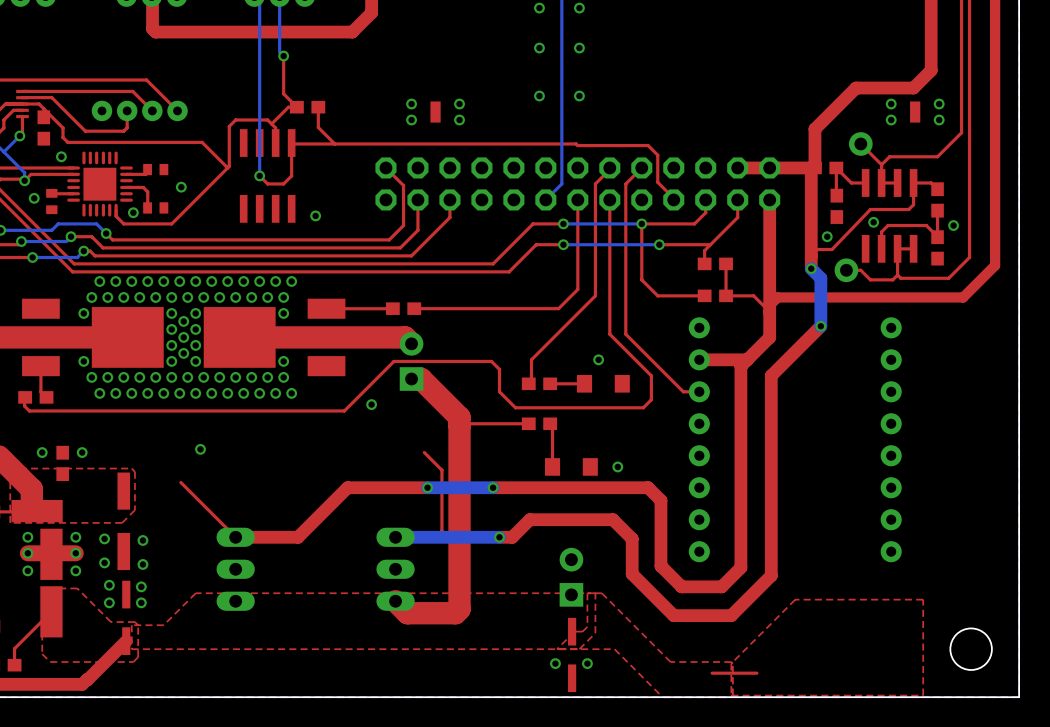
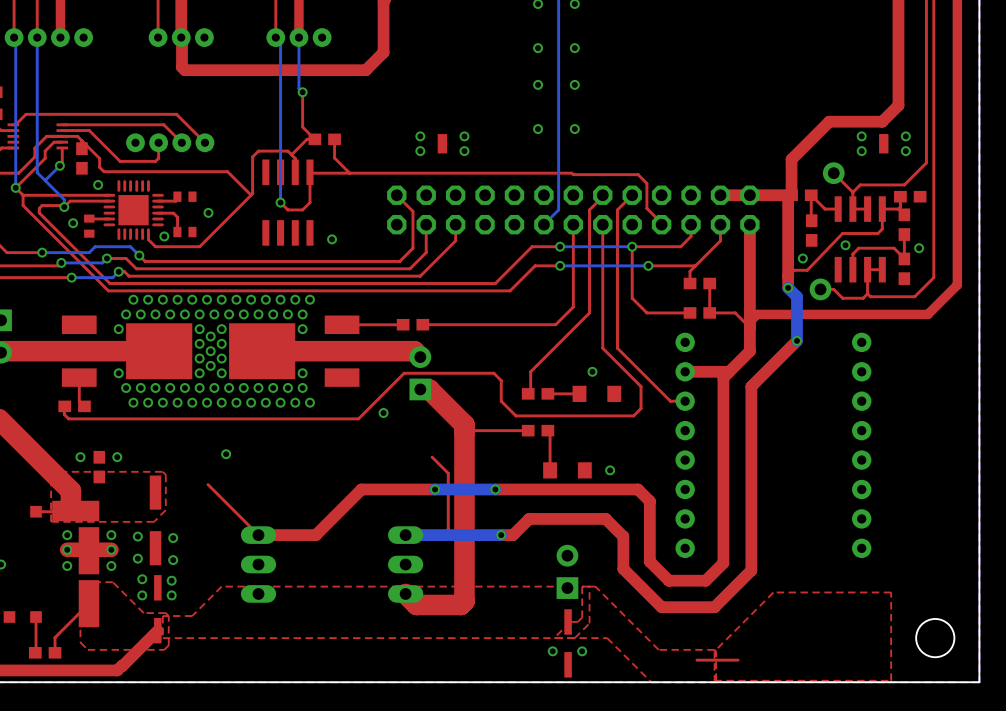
top track: none -> (900, 196) (900, 207) (898, 209)
part: none -> (910, 196)

